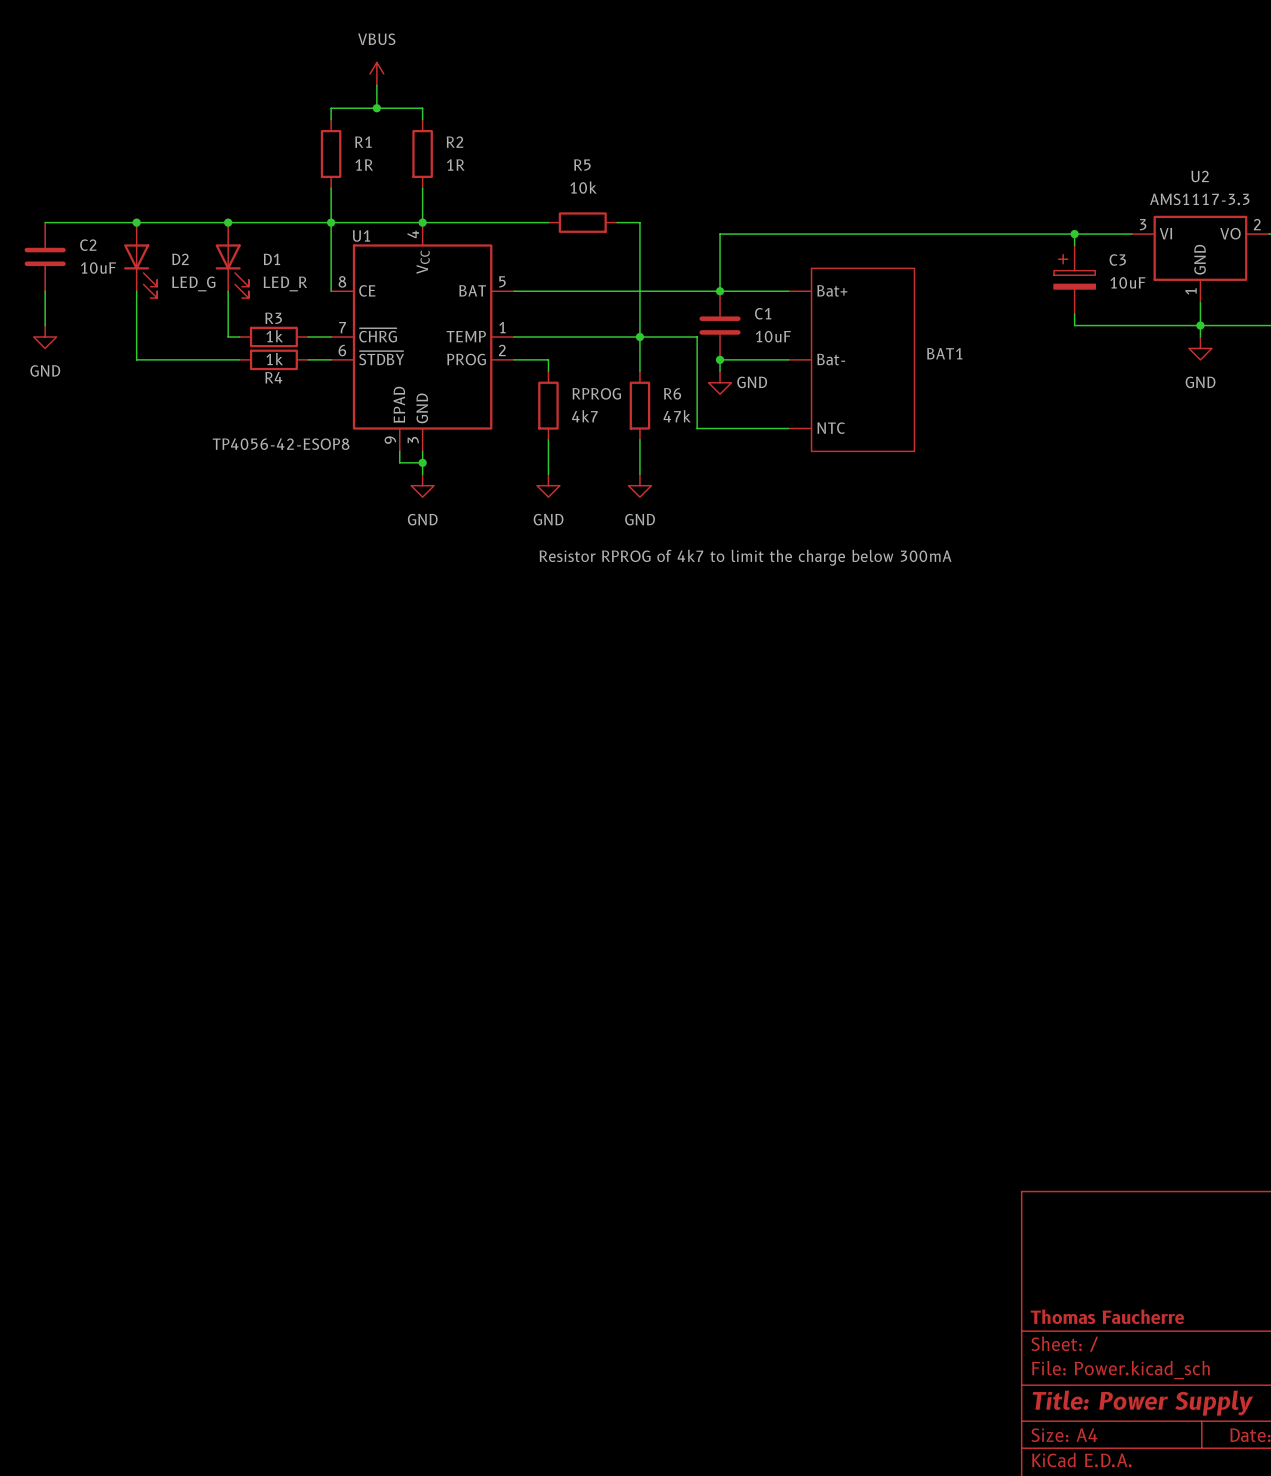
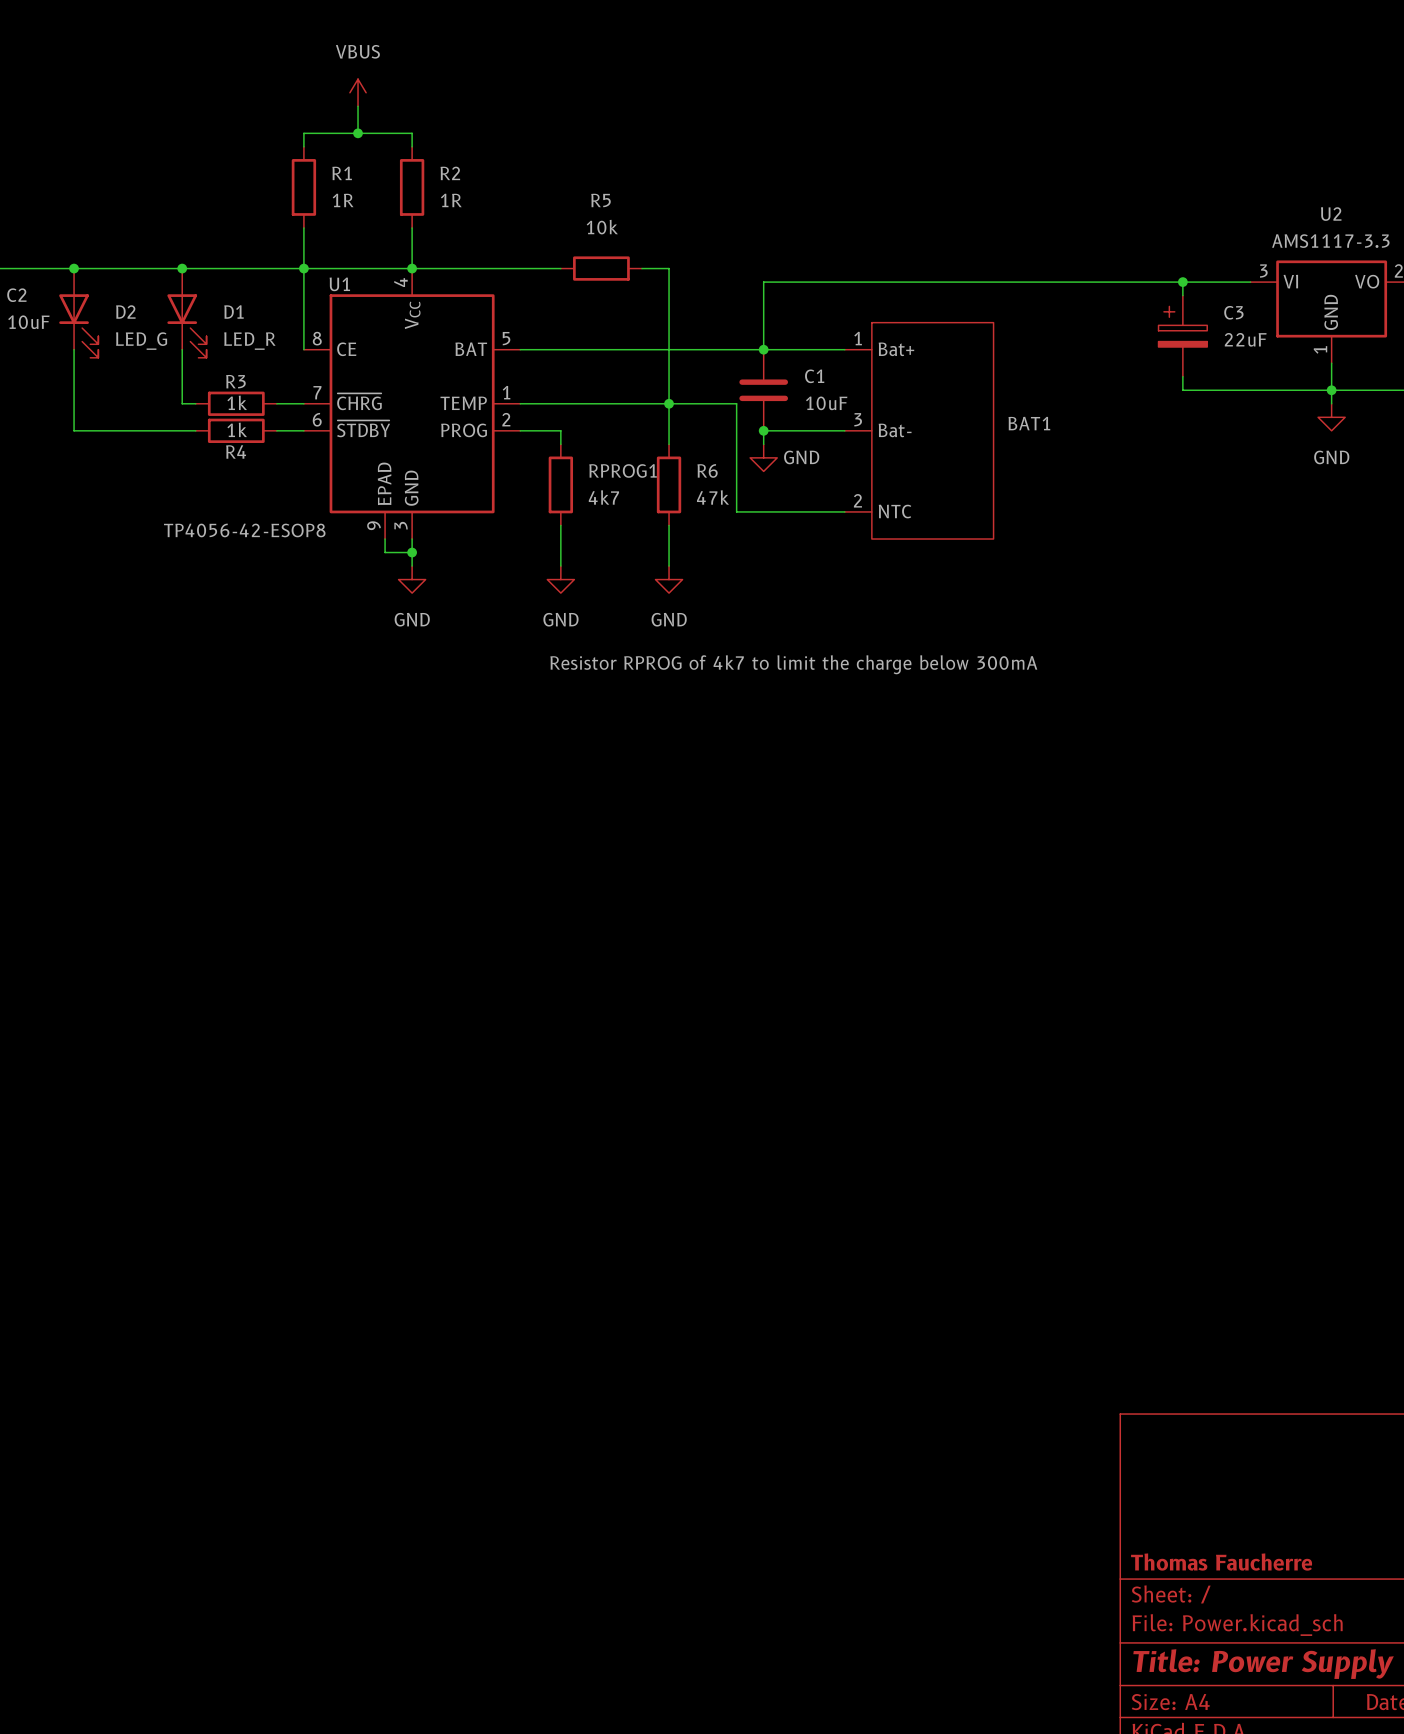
BAT1 pin number: none -> 1 (858, 338)
C3 value: 10uF (1127, 282) -> 22uF (1245, 339)
BAT1 pin number: none -> 3 (858, 419)
RPROG name: RPROG (596, 393) -> RPROG1 (623, 470)
BAT1 pin number: none -> 2 (857, 500)

